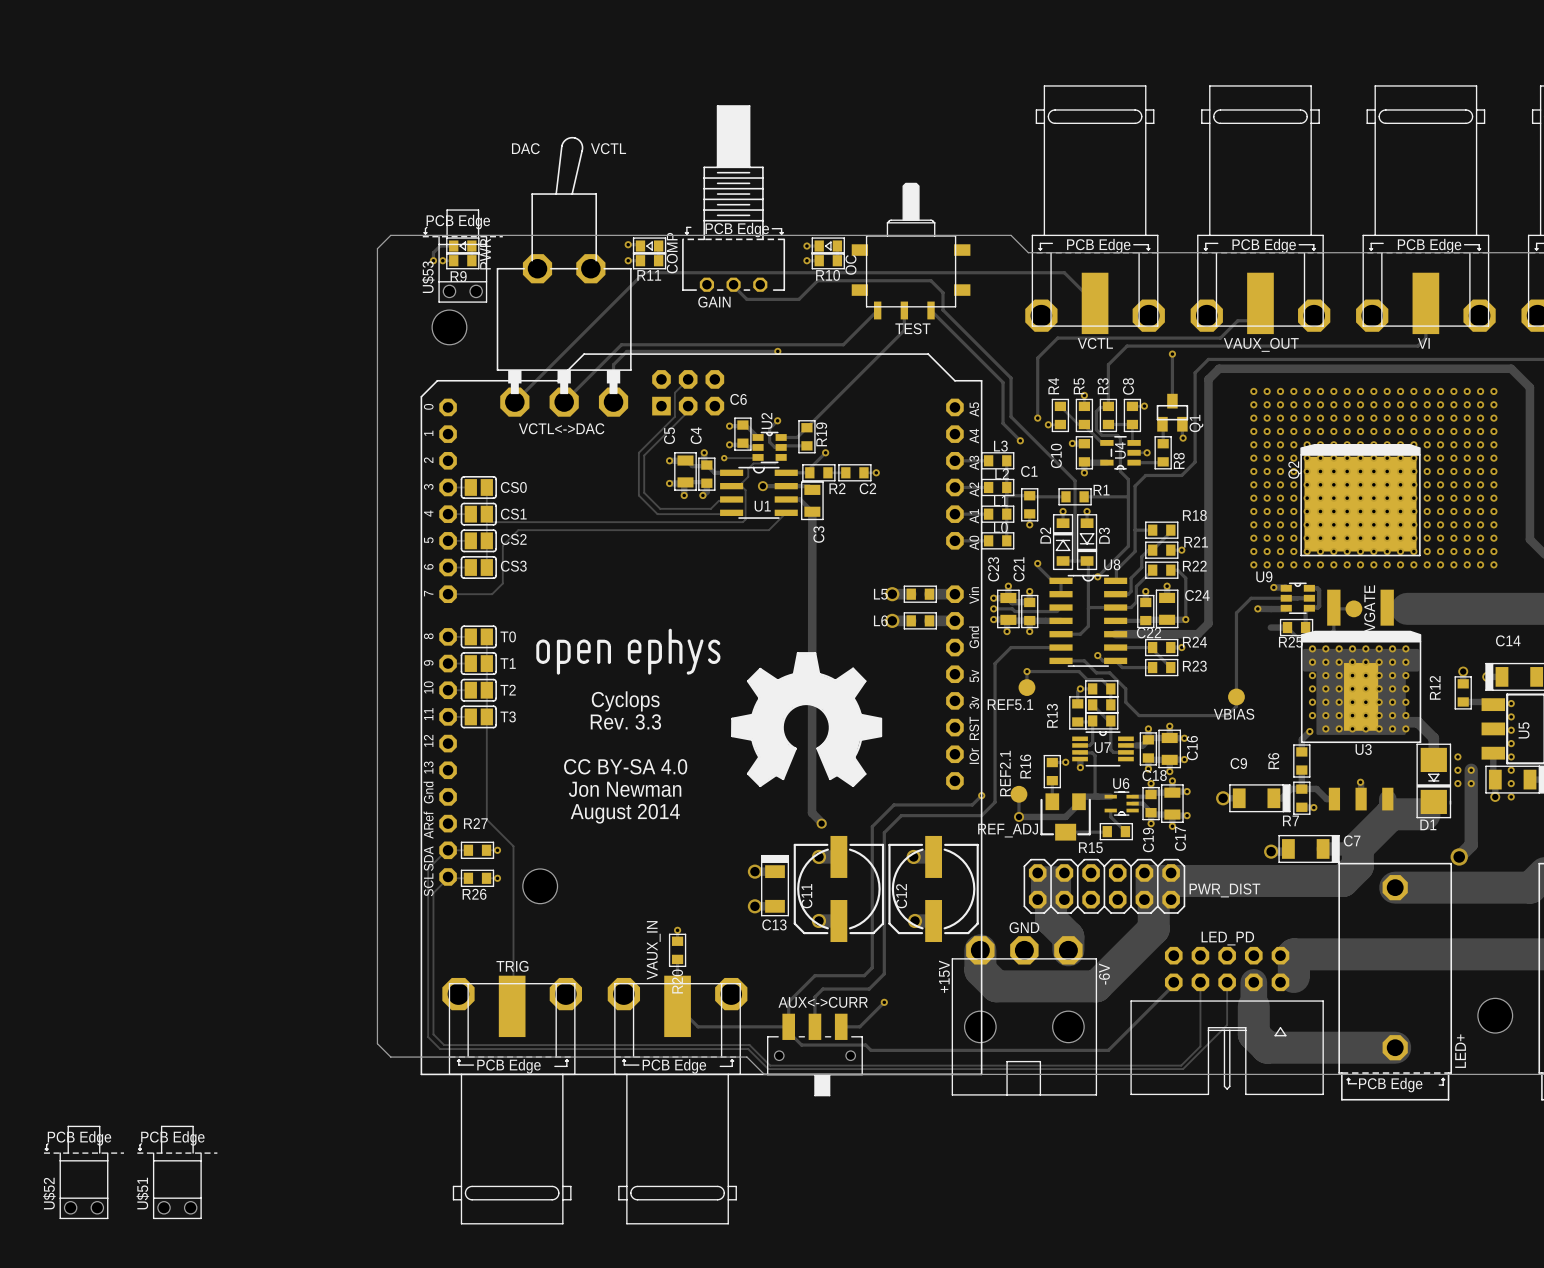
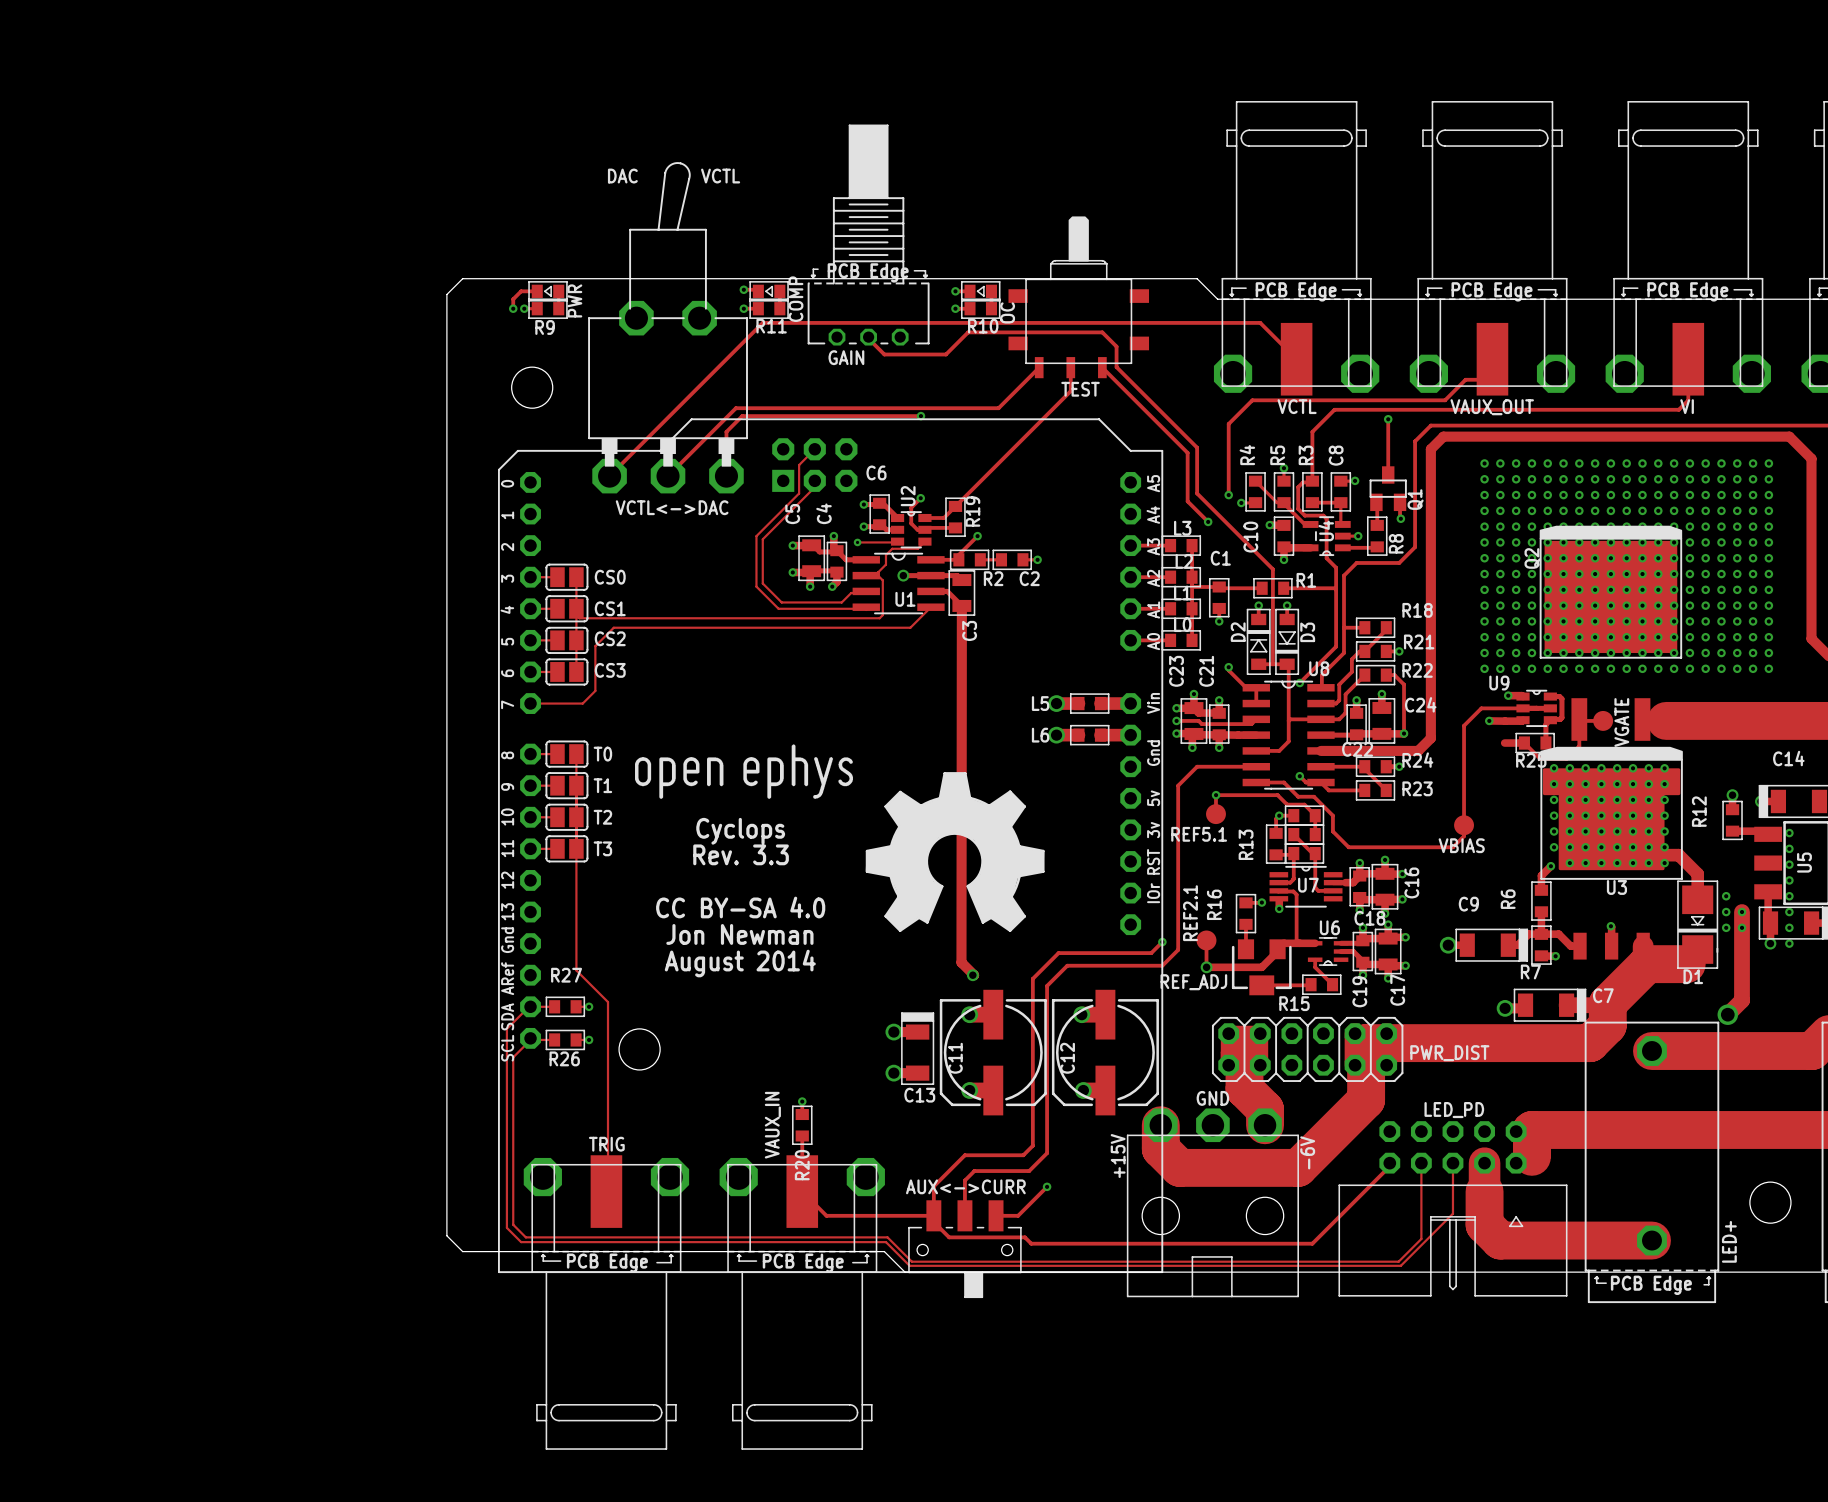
U$53: (462, 256) -> none
U$52: (83, 1172) -> none
U$51: (177, 1172) -> none

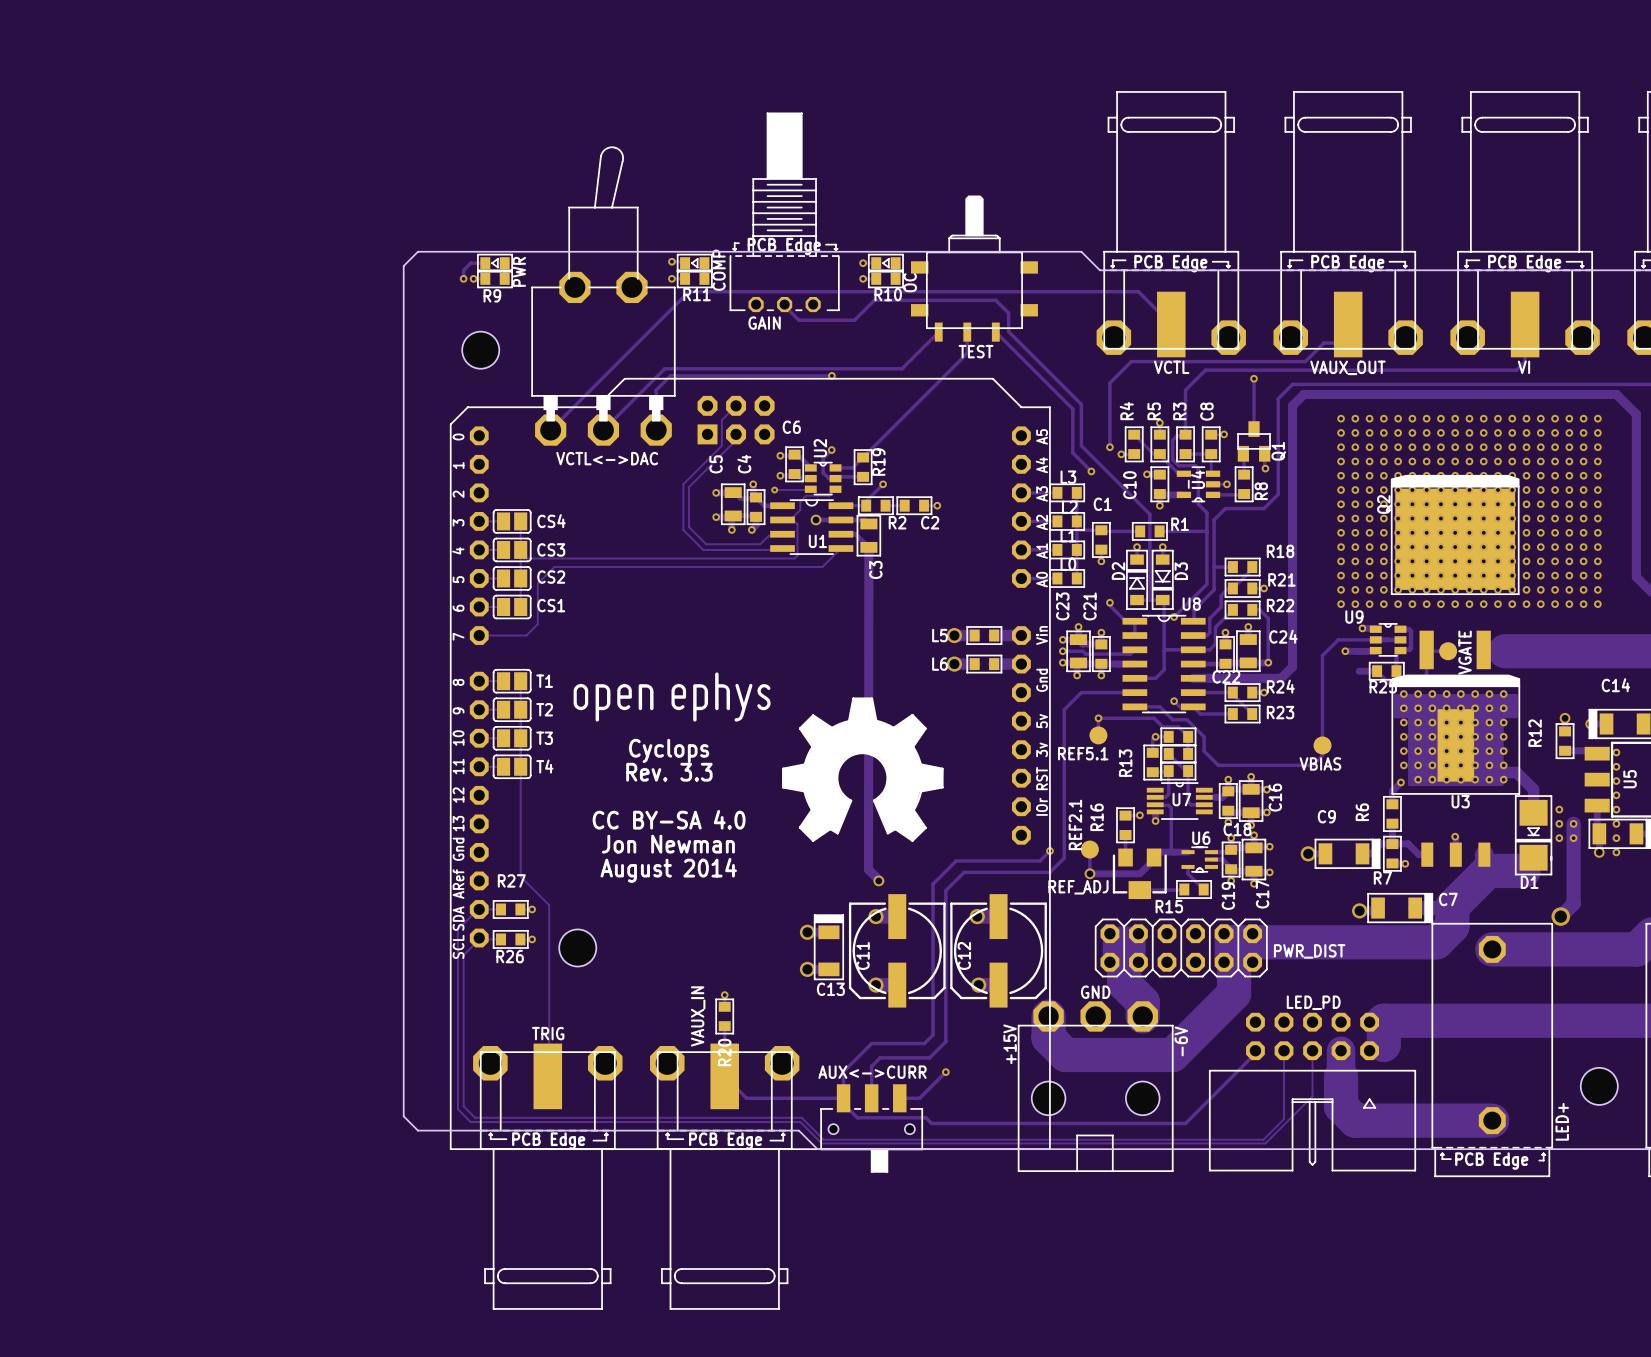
text: DAC (622, 176) -> none
text: VCTL (720, 176) -> none
CS0 name: CS0 (610, 577) -> CS4 (551, 521)
CS1 name: CS1 (610, 608) -> CS3 (551, 549)
CS3 name: CS3 (610, 670) -> CS1 (551, 605)
T0 name: T0 (602, 754) -> T1 (544, 681)
T1 name: T1 (602, 785) -> T2 (544, 709)
T2 name: T2 (602, 817) -> T3 (544, 738)
T3 name: T3 (602, 848) -> T4 (544, 766)

